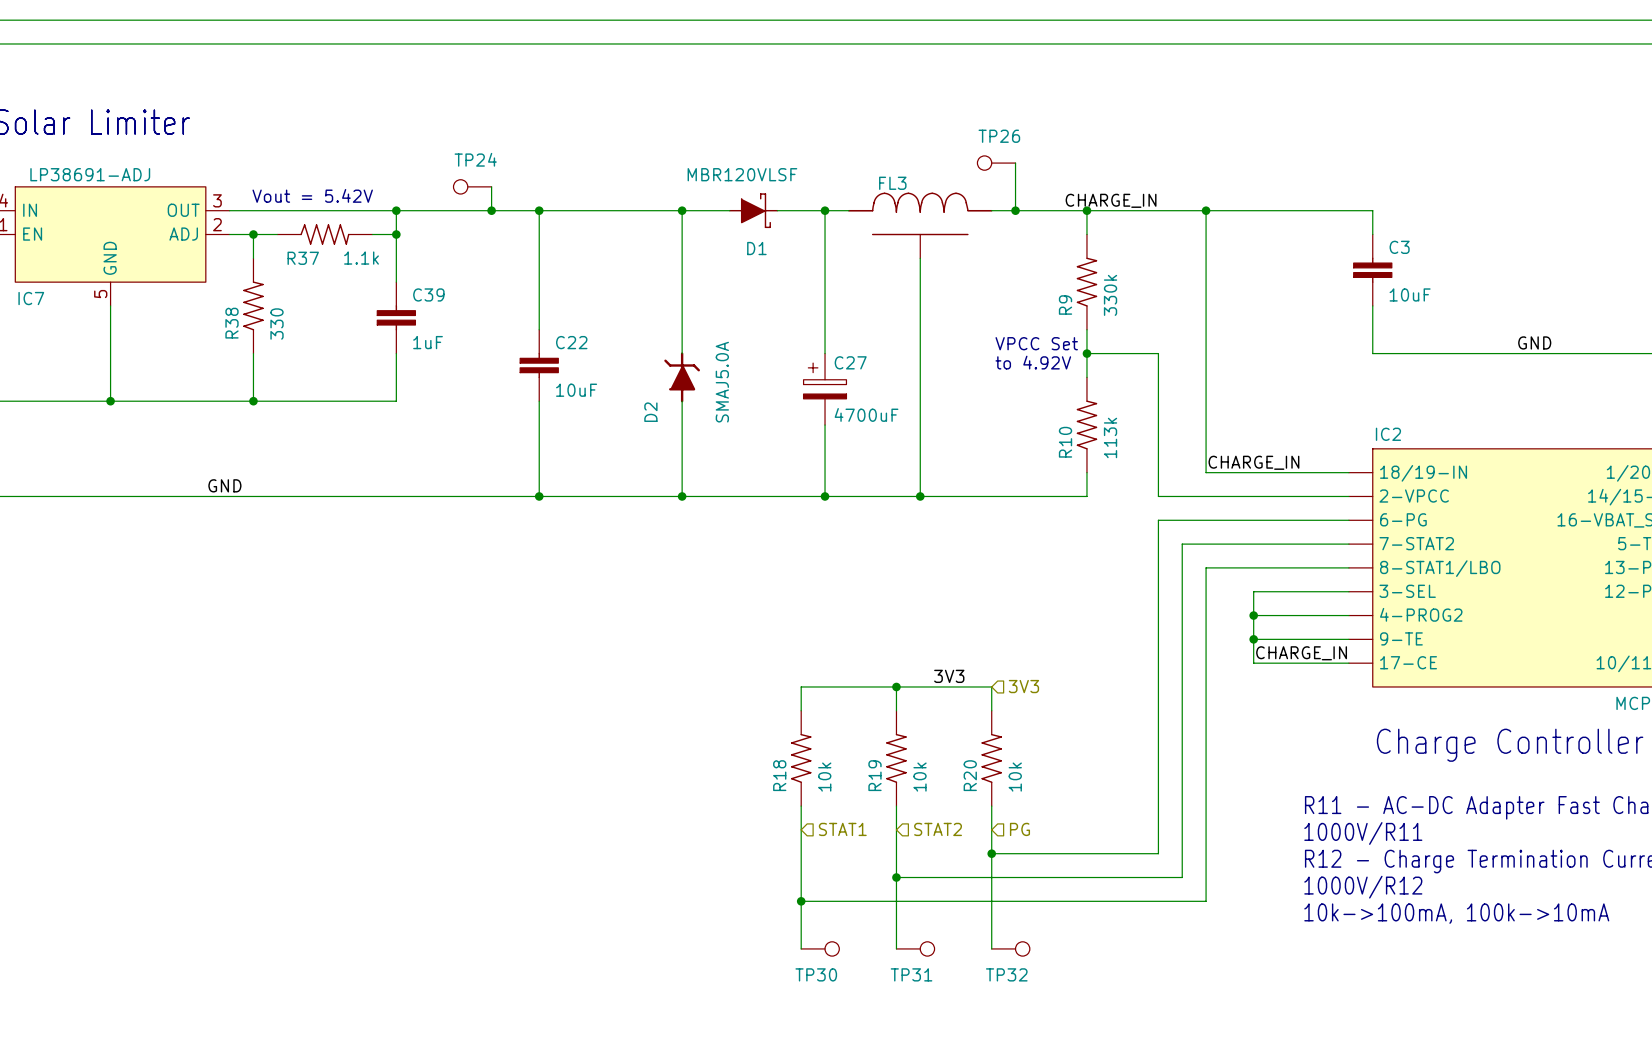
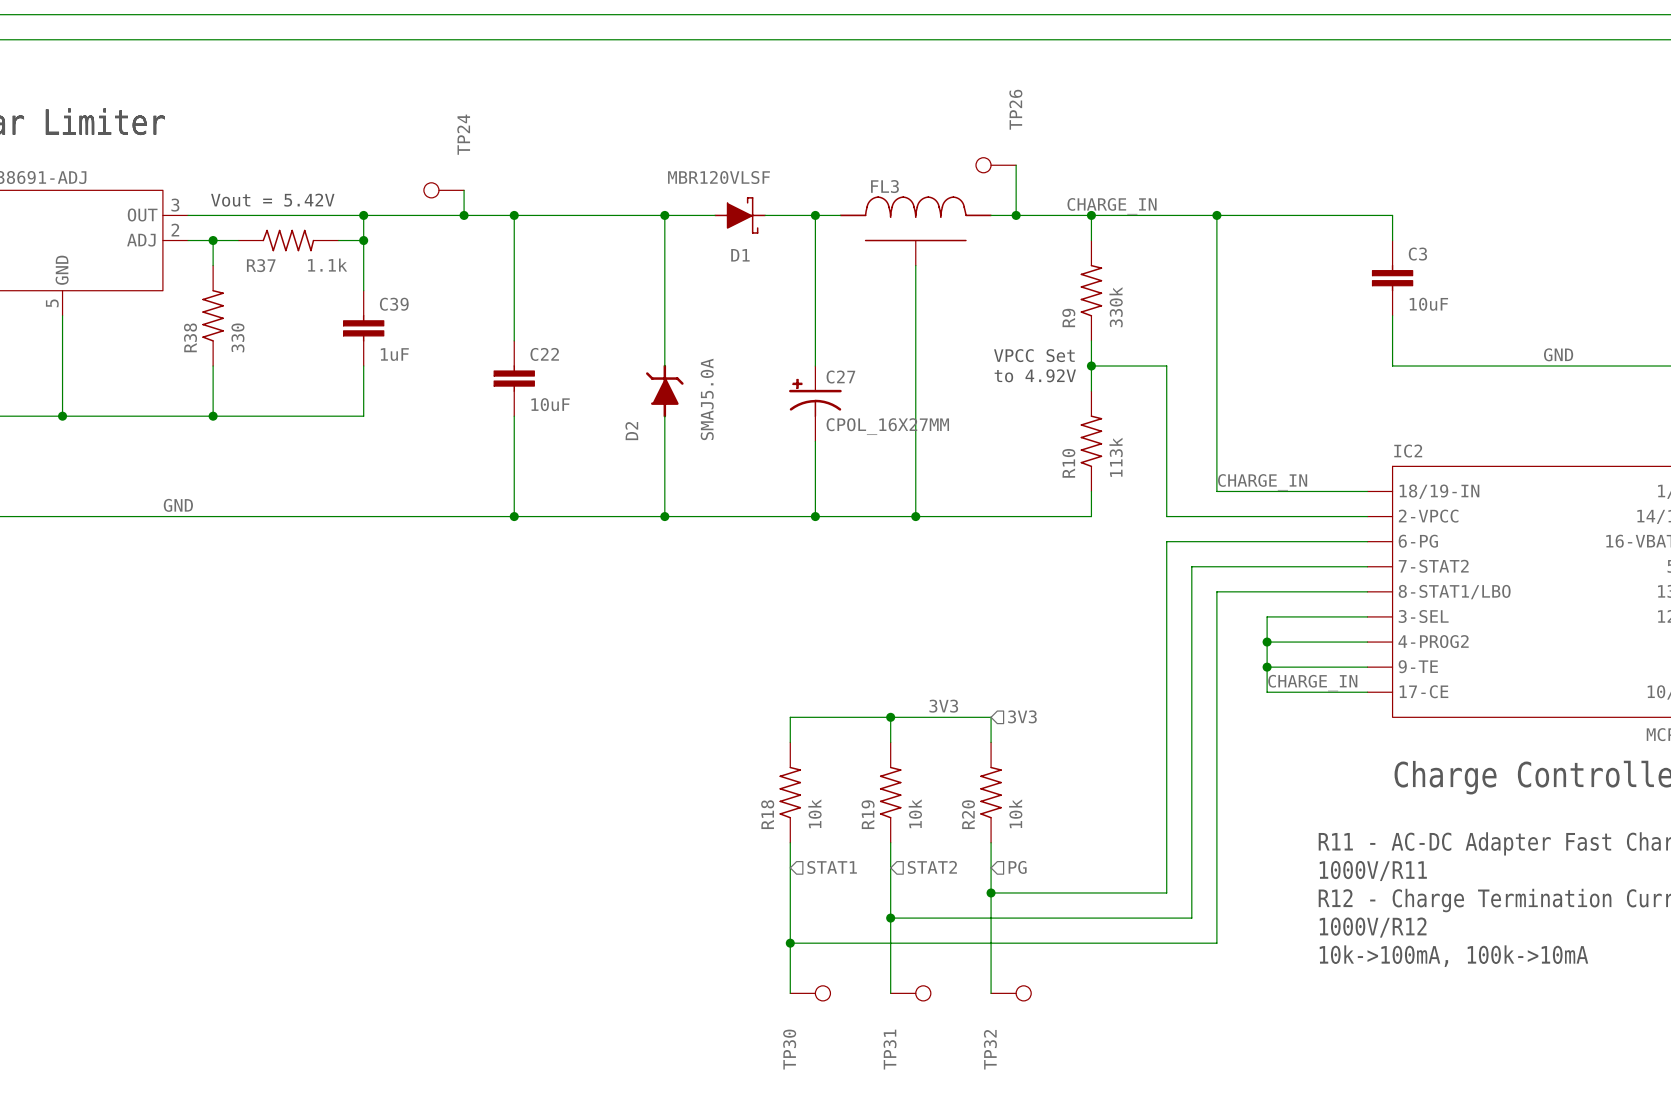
TP26 name rotation: 0° (999, 136) -> 90° counterclockwise (1015, 109)
TP24 name rotation: 0° (475, 159) -> 90° counterclockwise (463, 134)
C27 symbol: [803, 353, 847, 426] -> [789, 366, 842, 442]
C27 value: 4700uF (866, 414) -> CPOL_16X27MM (887, 426)
TP30 name rotation: 0° (816, 974) -> 90° counterclockwise (789, 1049)
TP31 name rotation: 0° (911, 974) -> 90° counterclockwise (890, 1049)
TP32 name rotation: 0° (1006, 974) -> 90° counterclockwise (990, 1049)

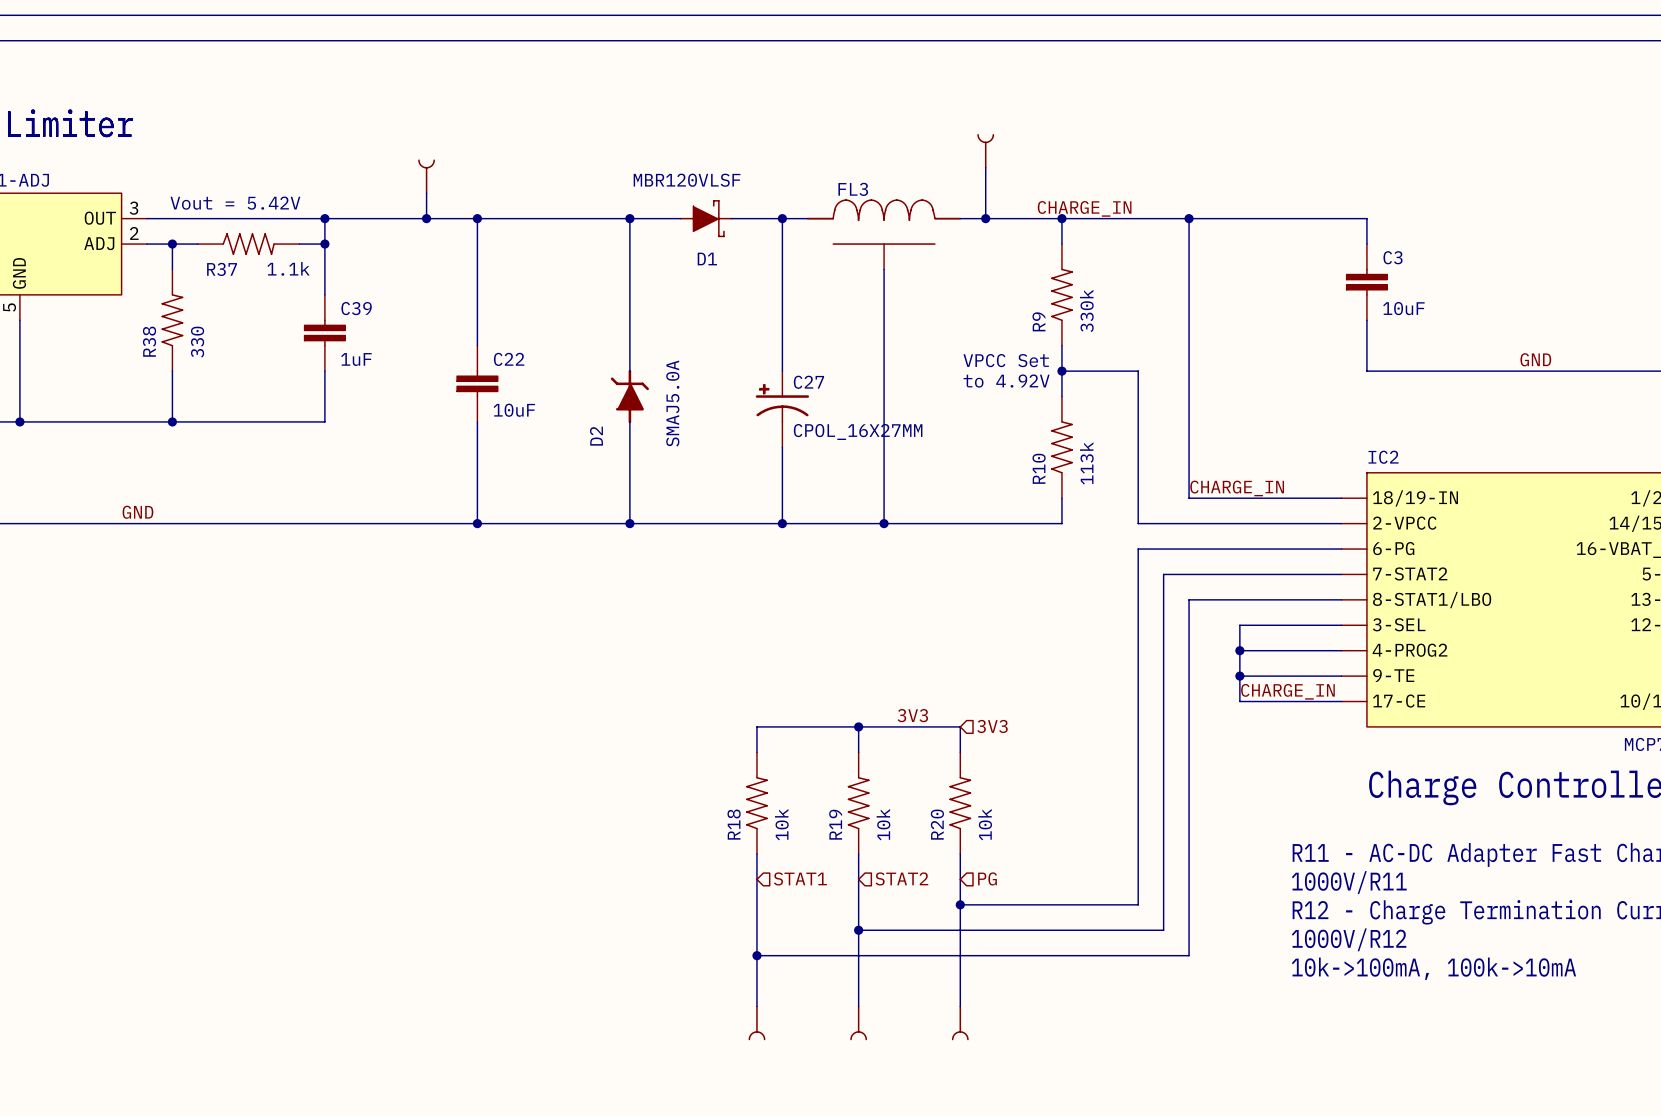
part: none -> (985, 151)
TP26: (996, 165) -> none
part: none -> (426, 176)
TP24: (443, 190) -> none
TP30: (810, 993) -> none
TP31: (910, 993) -> none
TP32: (1011, 993) -> none
part: none -> (756, 1023)
part: none -> (858, 1023)
part: none -> (960, 1023)

